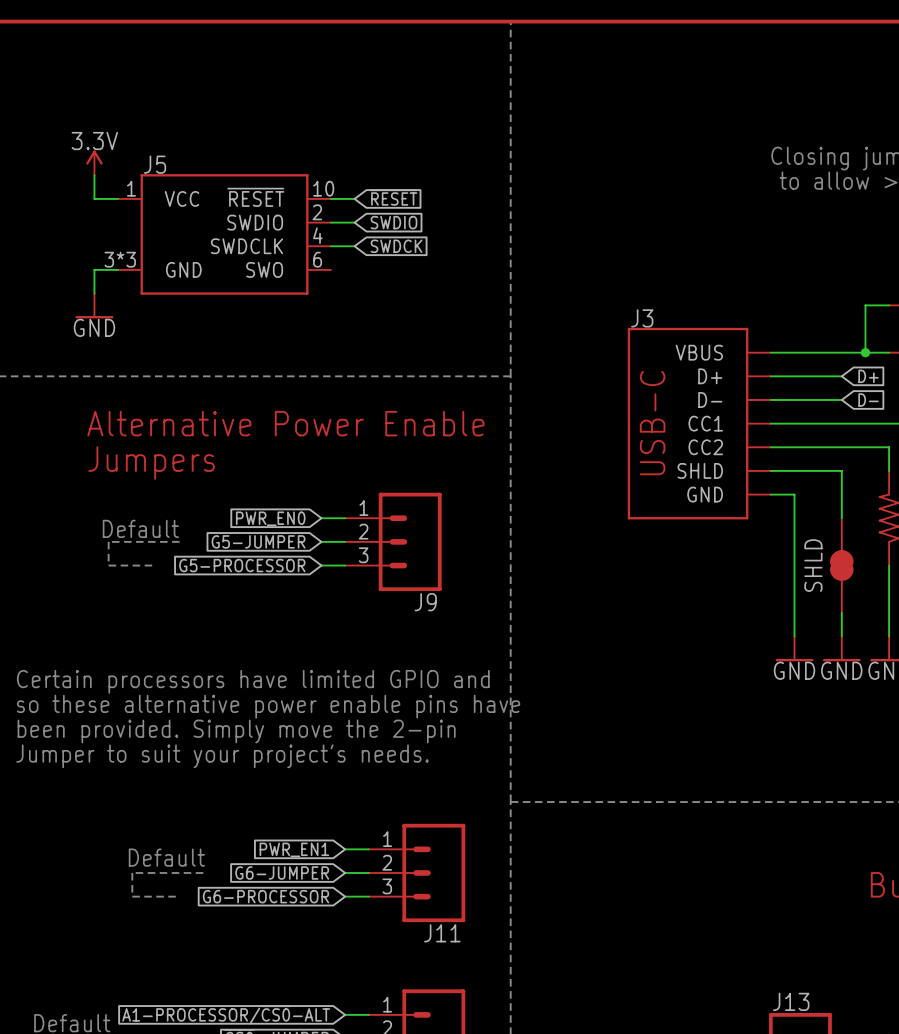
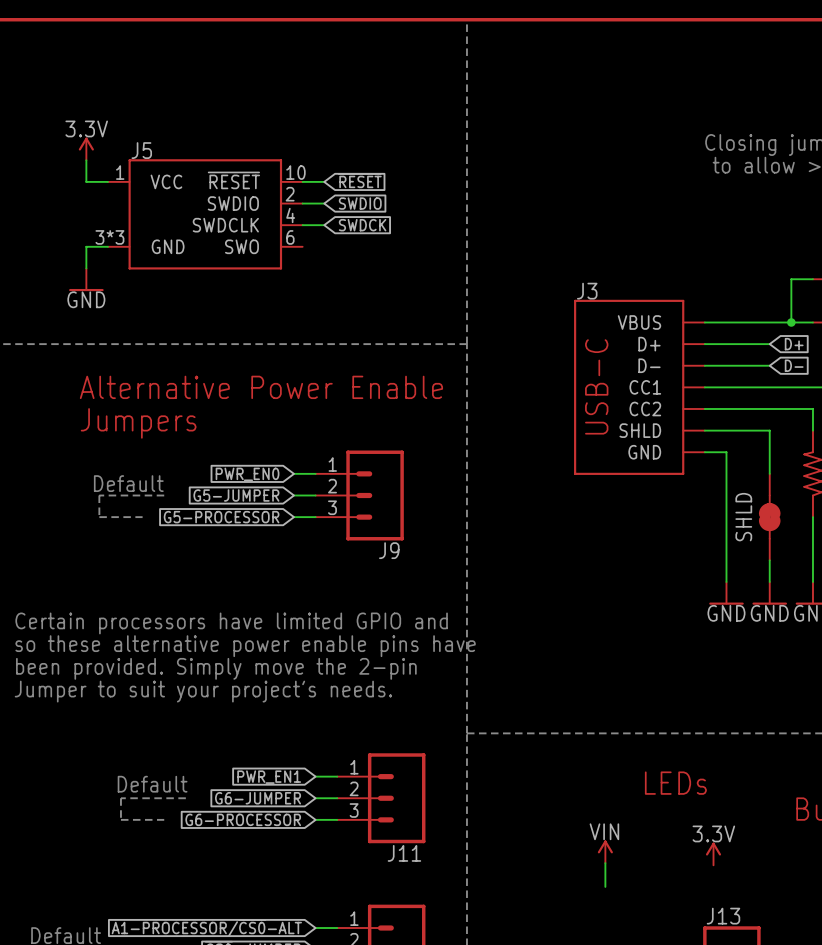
text: none -> LEDs (675, 783)
power symbol: none -> VIN (605, 851)
power symbol: none -> 3.3V (713, 853)
wire: none -> (605, 863) (605, 886)

